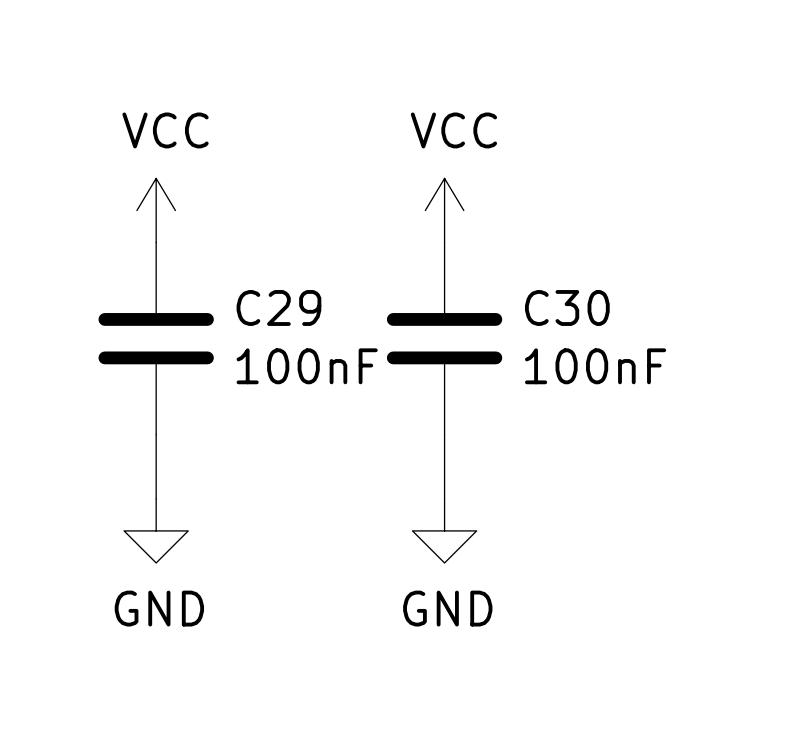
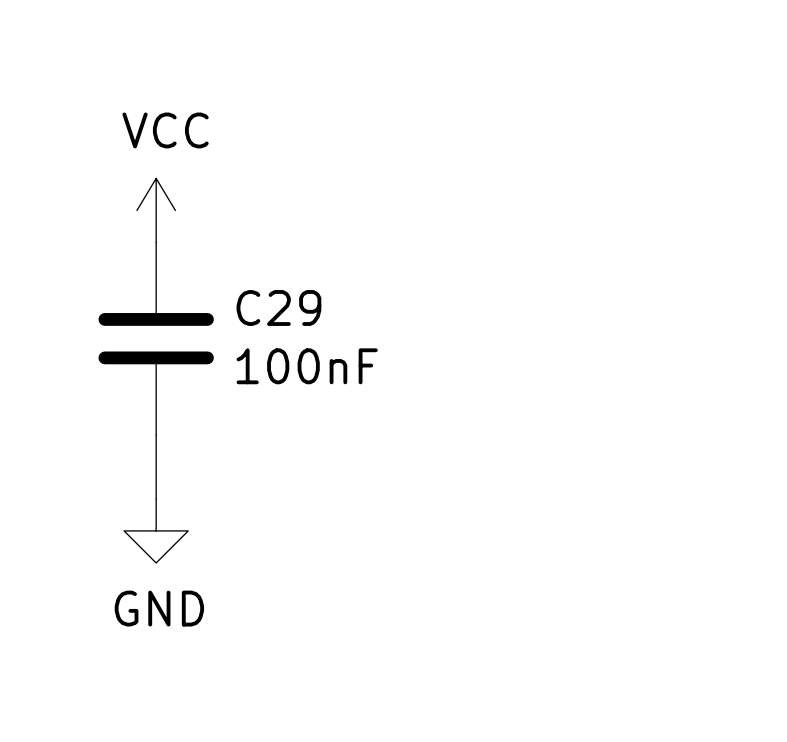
power symbol: VCC (444, 210) -> none
C30: 100nF (444, 338) -> none
wire: (444, 434) (444, 498) -> none
power symbol: GND (444, 530) -> none

